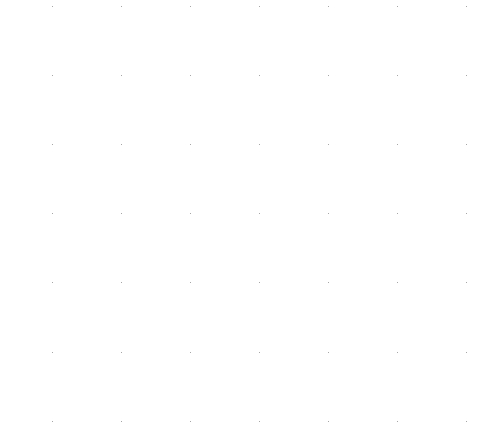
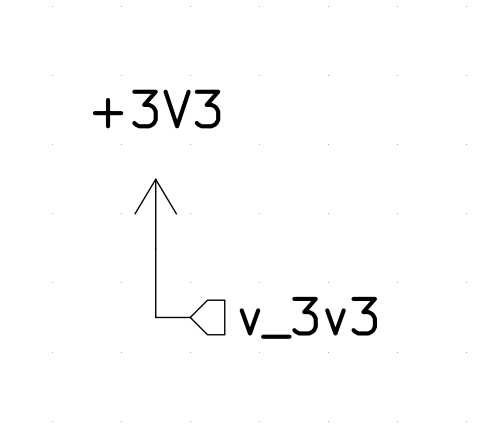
power symbol: none -> +3V3 (155, 213)
wire: none -> (155, 248) (155, 317) (190, 317)
hierarchical label: none -> v_3v3 (308, 317)

